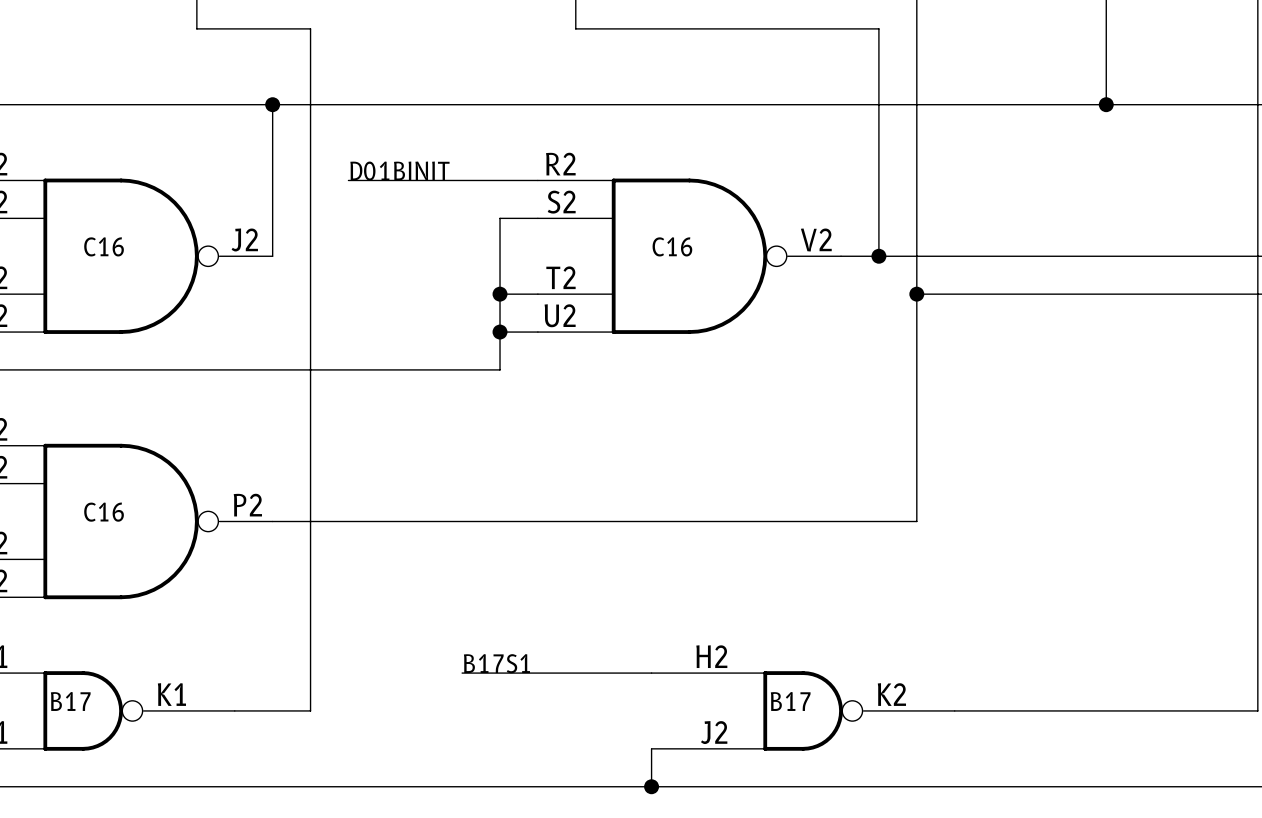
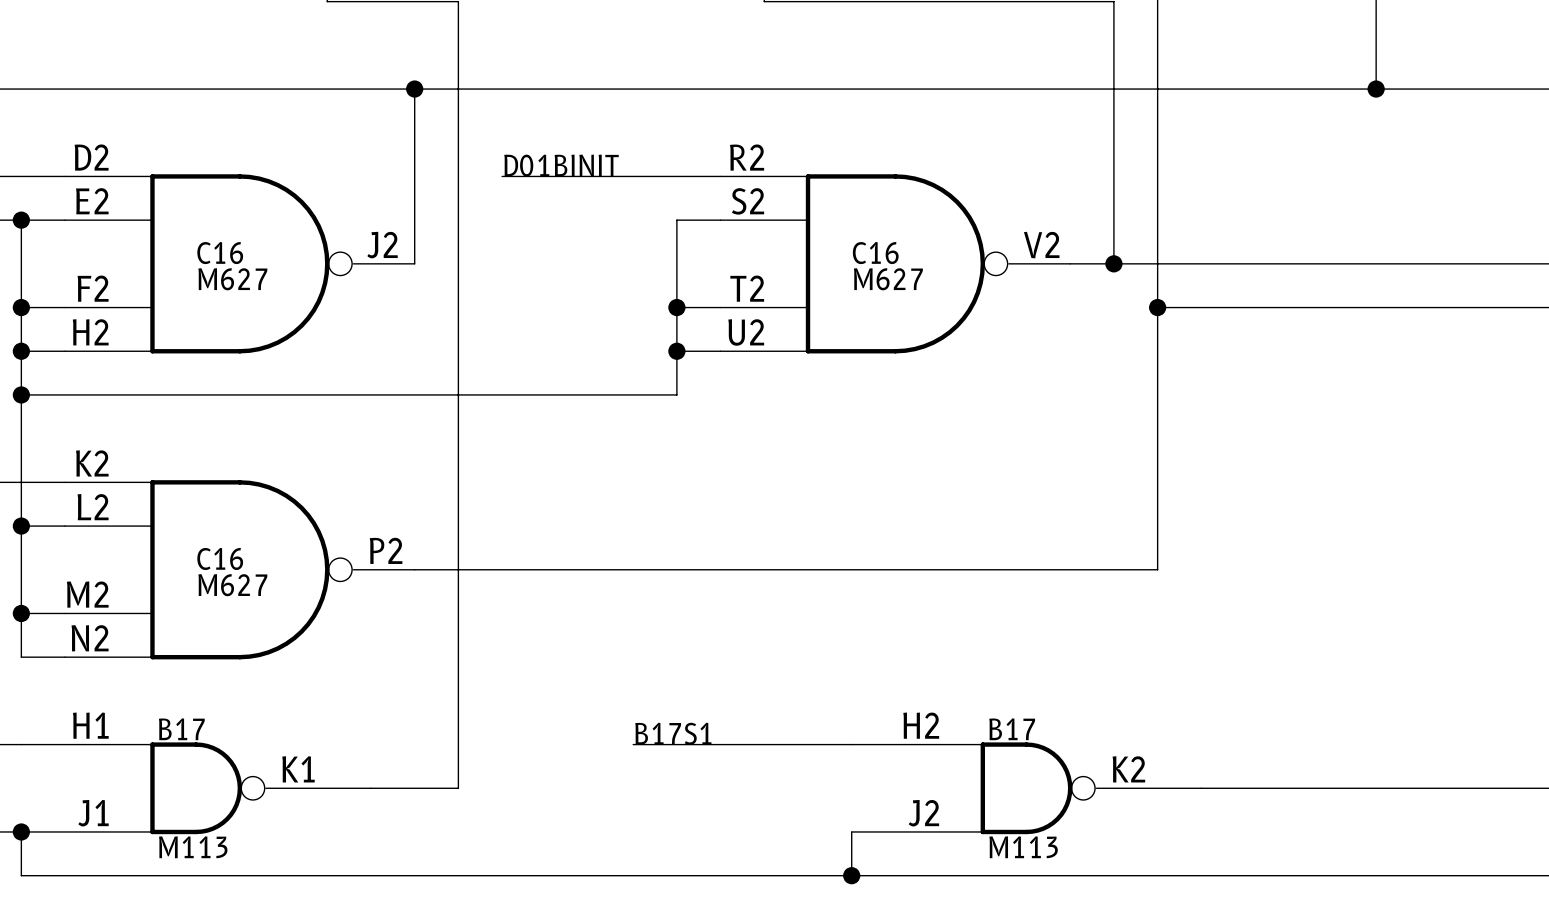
C16 value: none -> M627 (232, 279)
C16 value: none -> M627 (888, 279)
C16 value: none -> M627 (232, 585)
B17 name position: B17 (70, 701) -> B17 (181, 729)
B17 name position: B17 (790, 701) -> B17 (1012, 729)
B17 value: none -> M113 (193, 847)
B17 value: none -> M113 (1023, 847)

